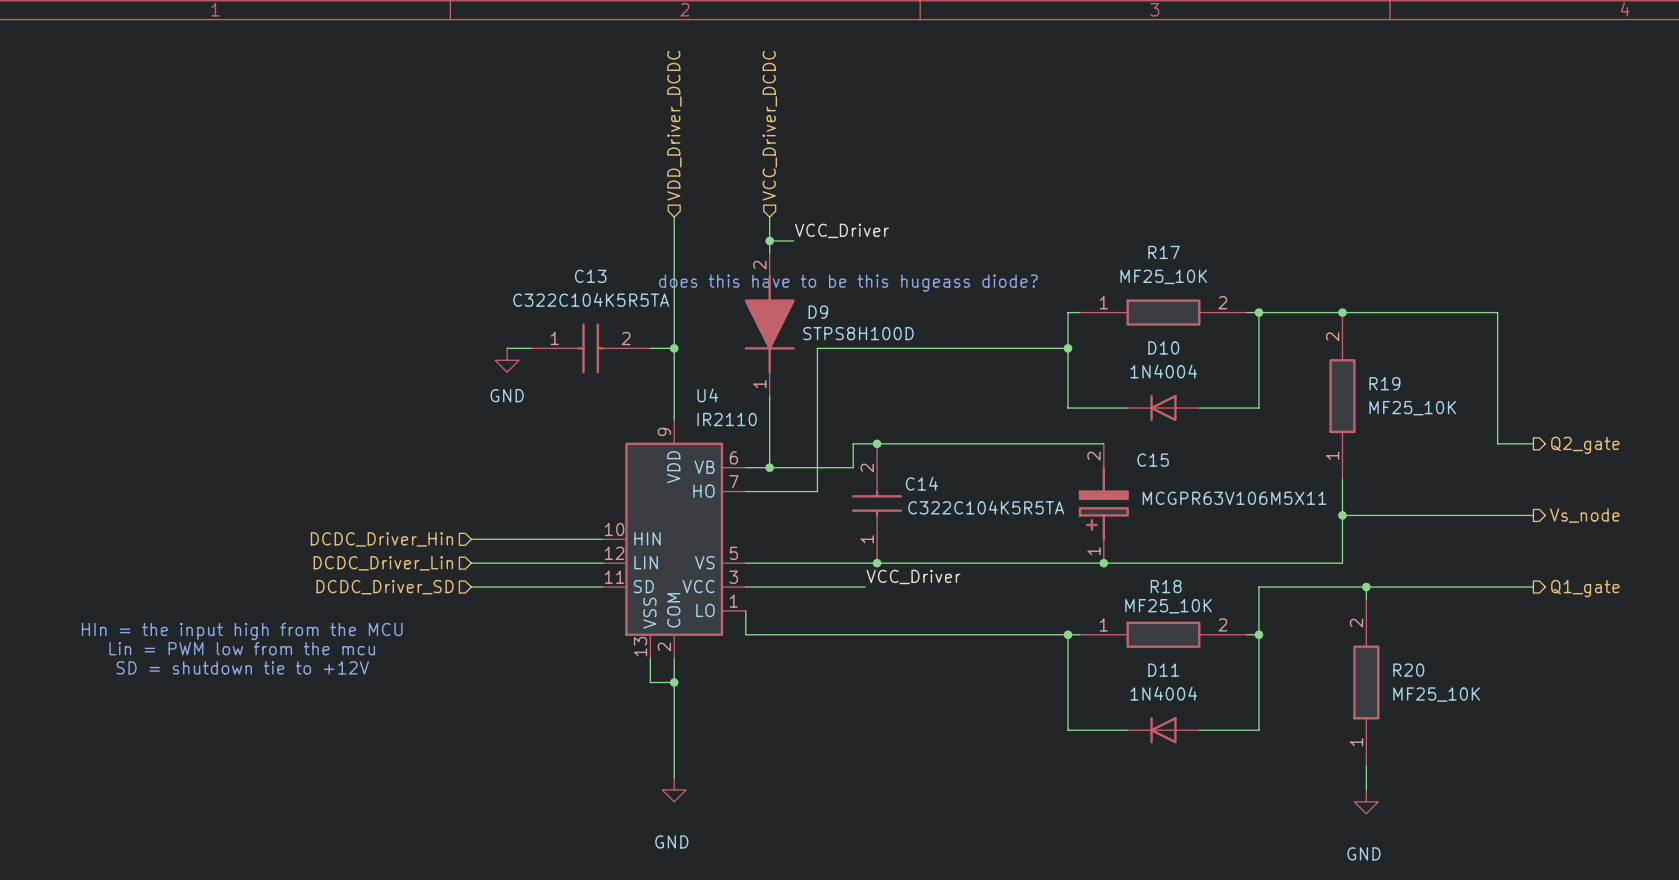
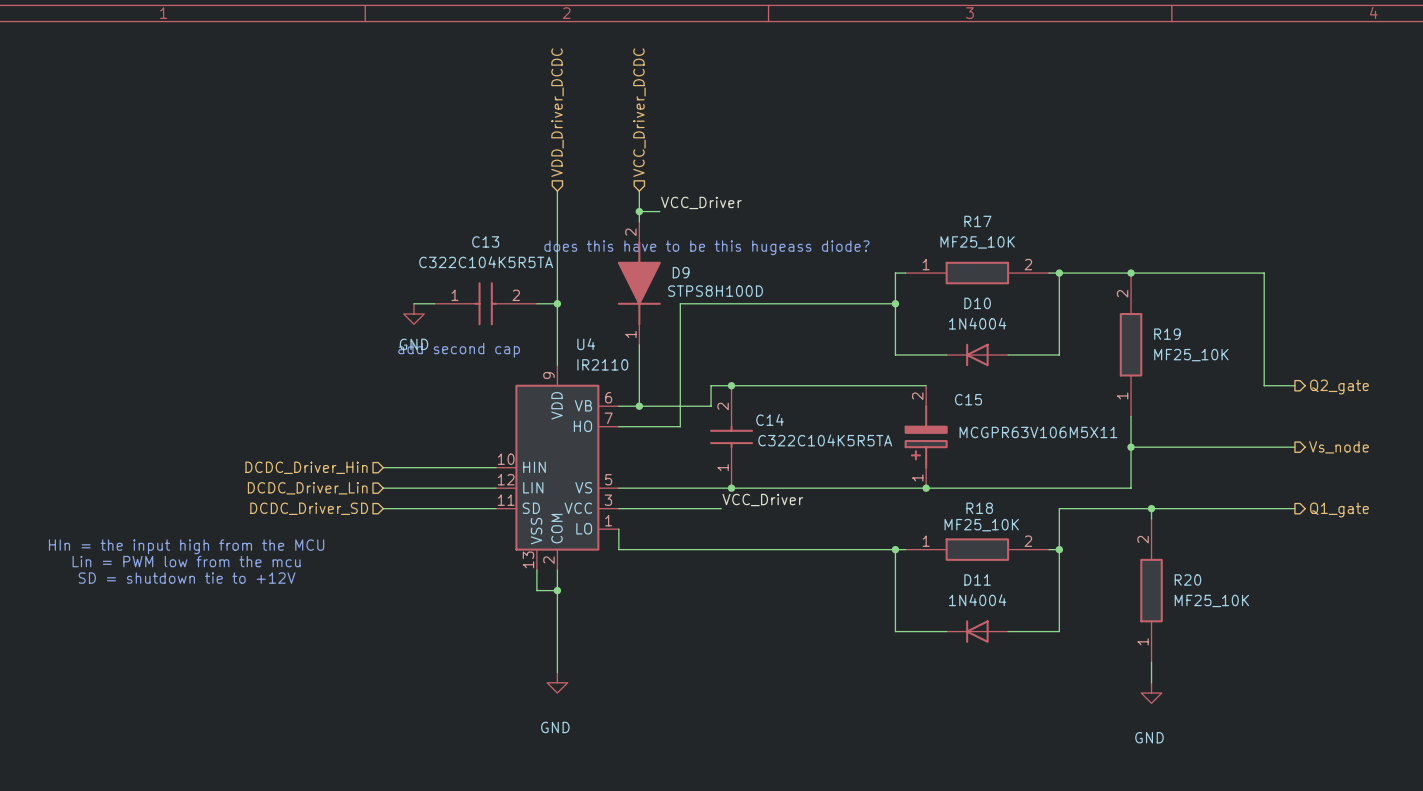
text: none -> add second cap (459, 350)

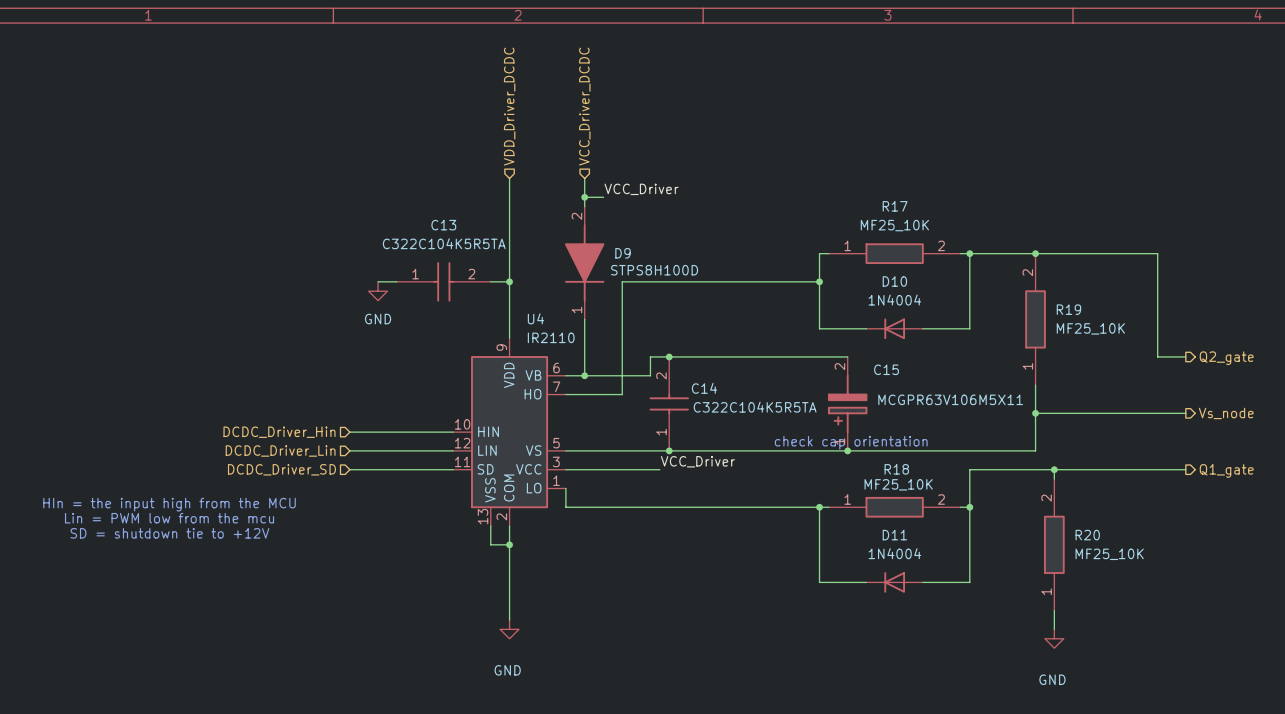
text: does this have to be this hugeass diode? (706, 247) -> none
text: add second cap (459, 350) -> none
text: none -> check cap orientation (851, 442)

